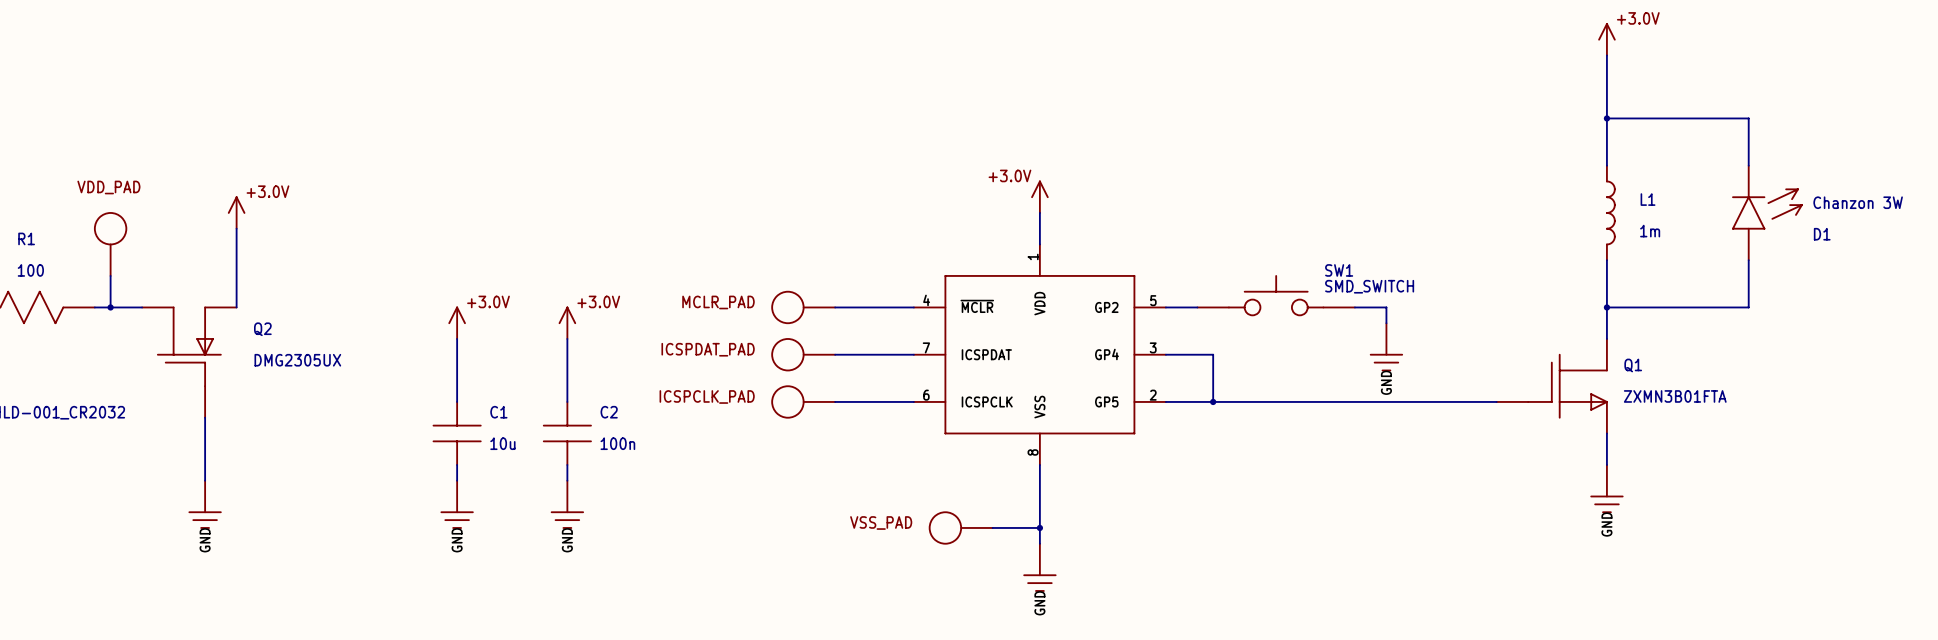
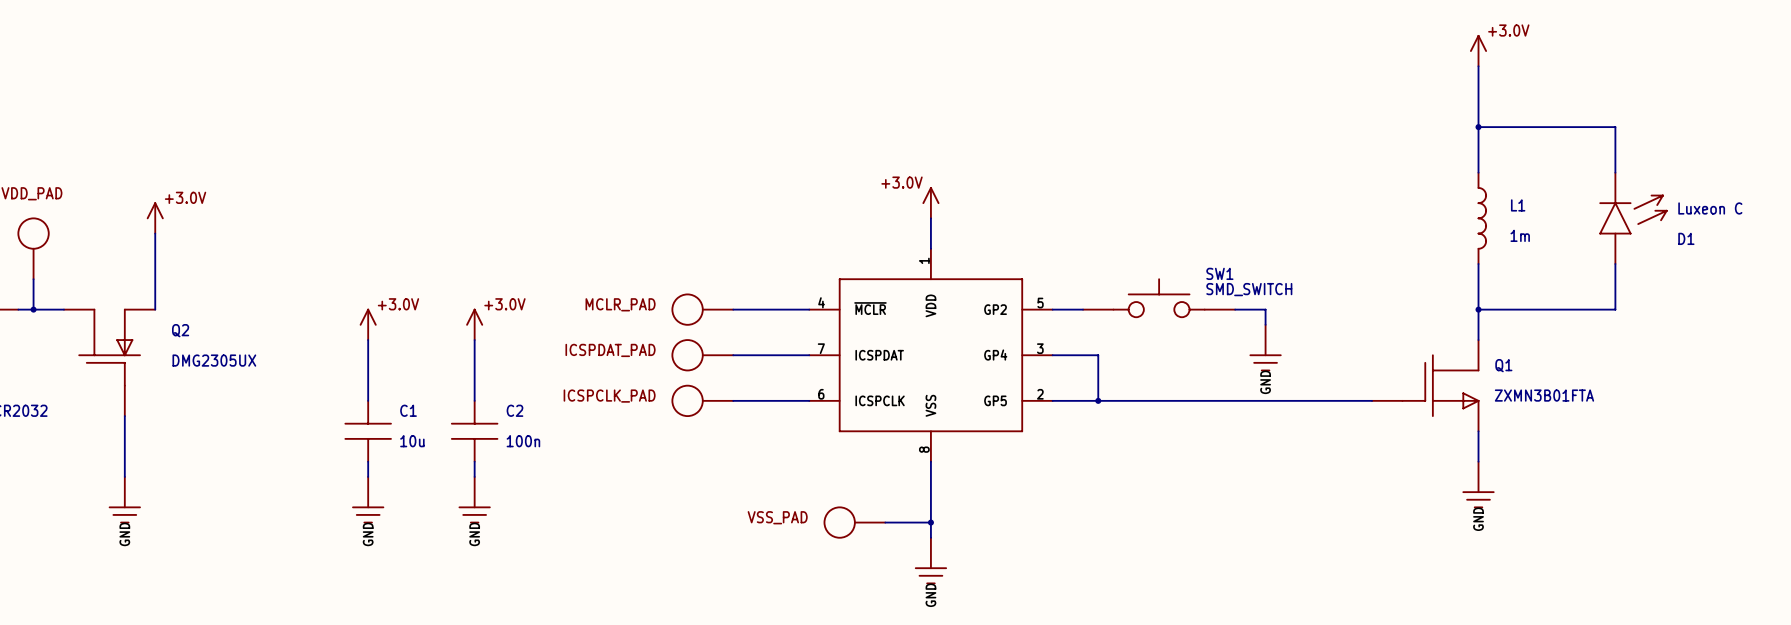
D1 value: Chanzon 3W (1858, 202) -> Luxeon C (1710, 208)

